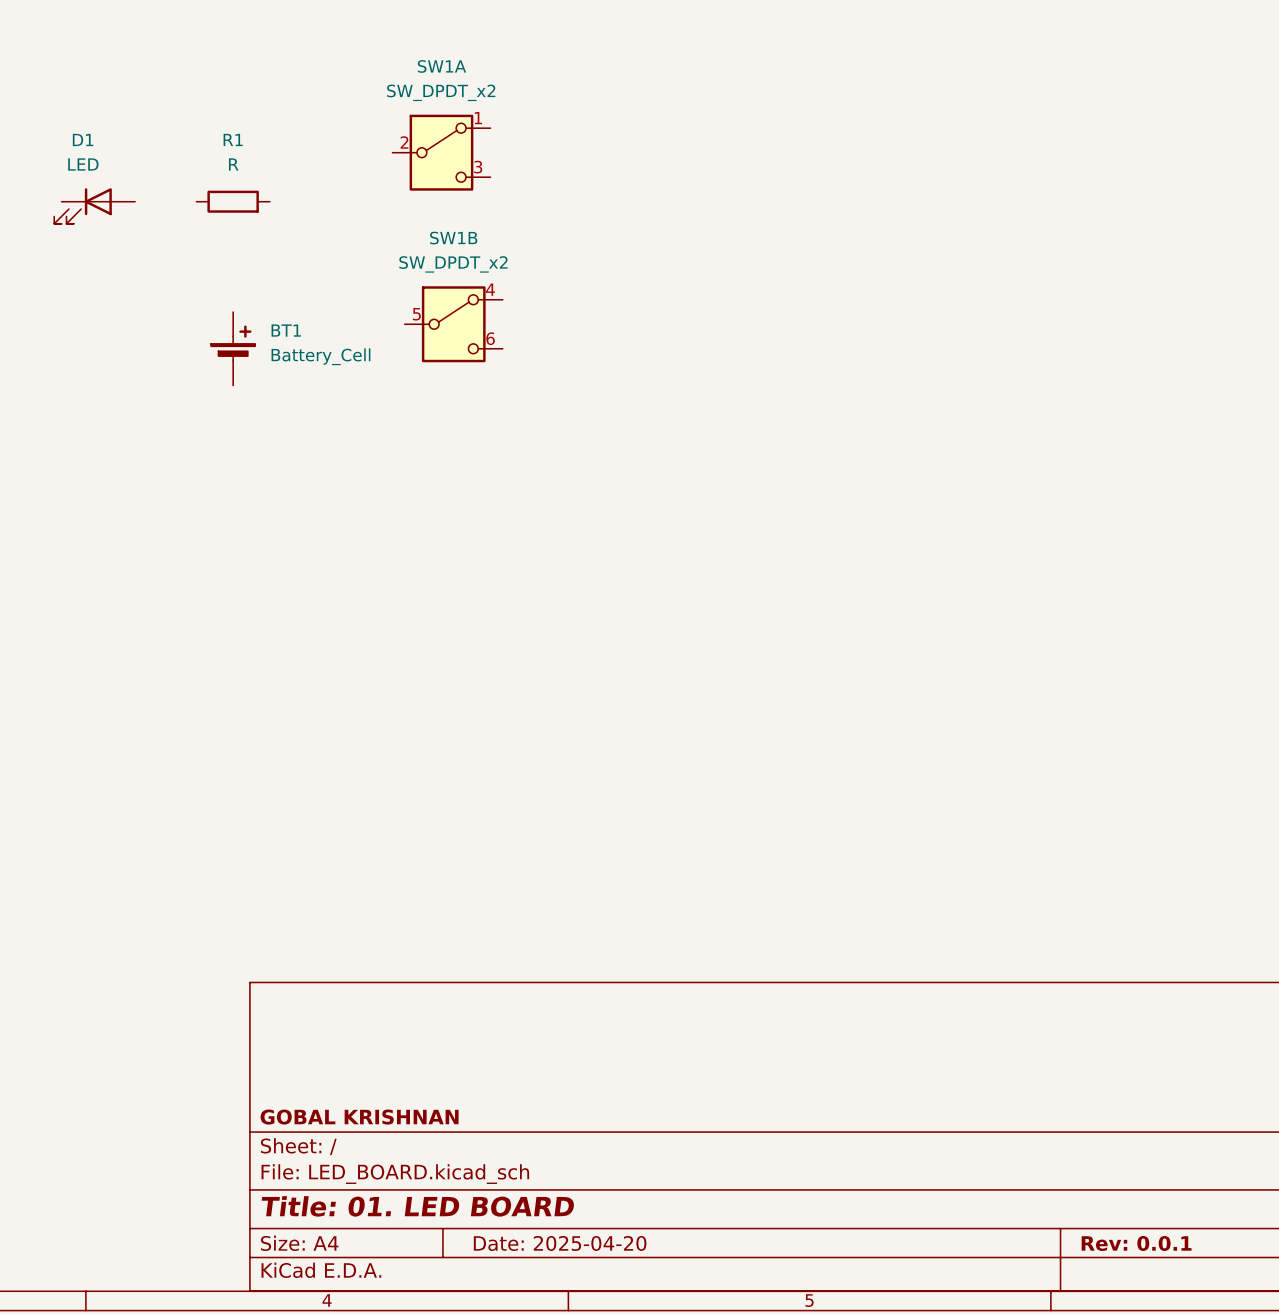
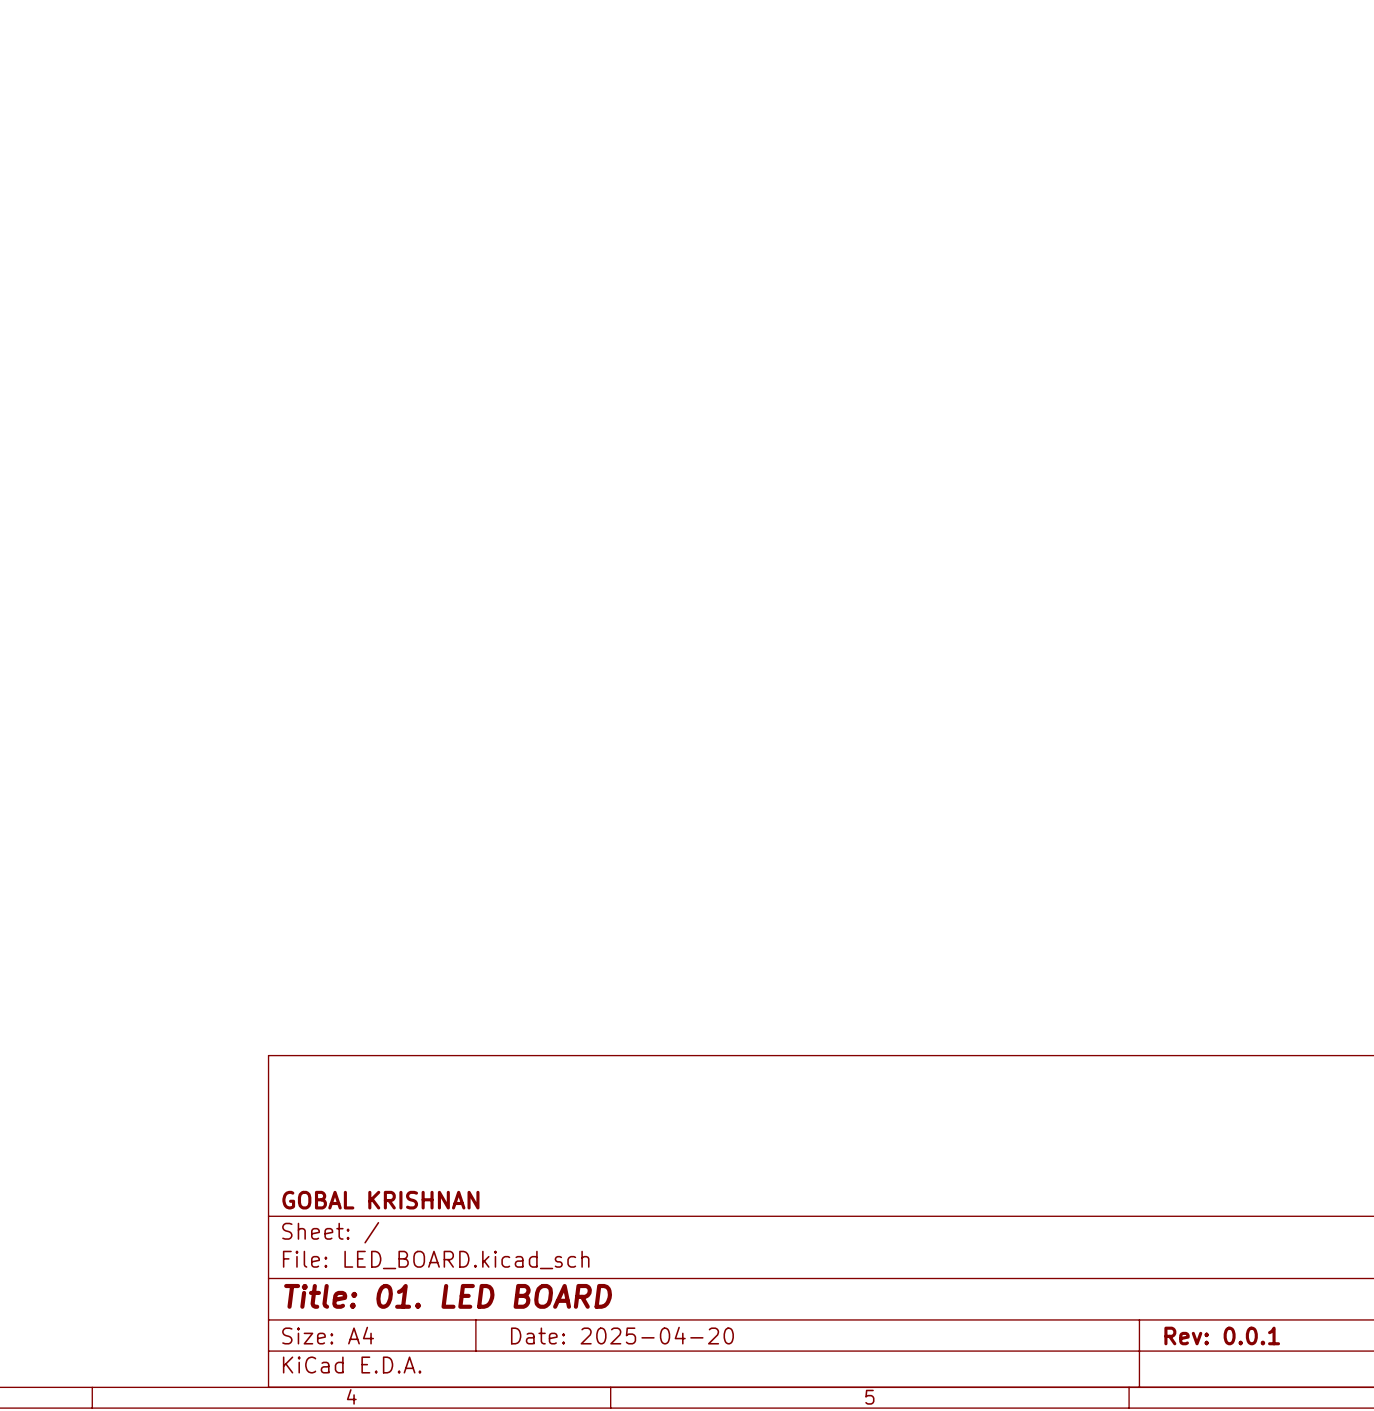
SW1A: SW_DPDT_x2 (441, 152) -> none
R1: R (233, 201) -> none
D1: LED (94, 206) -> none
SW1B: SW_DPDT_x2 (453, 324) -> none
BT1: Battery_Cell (233, 348) -> none

